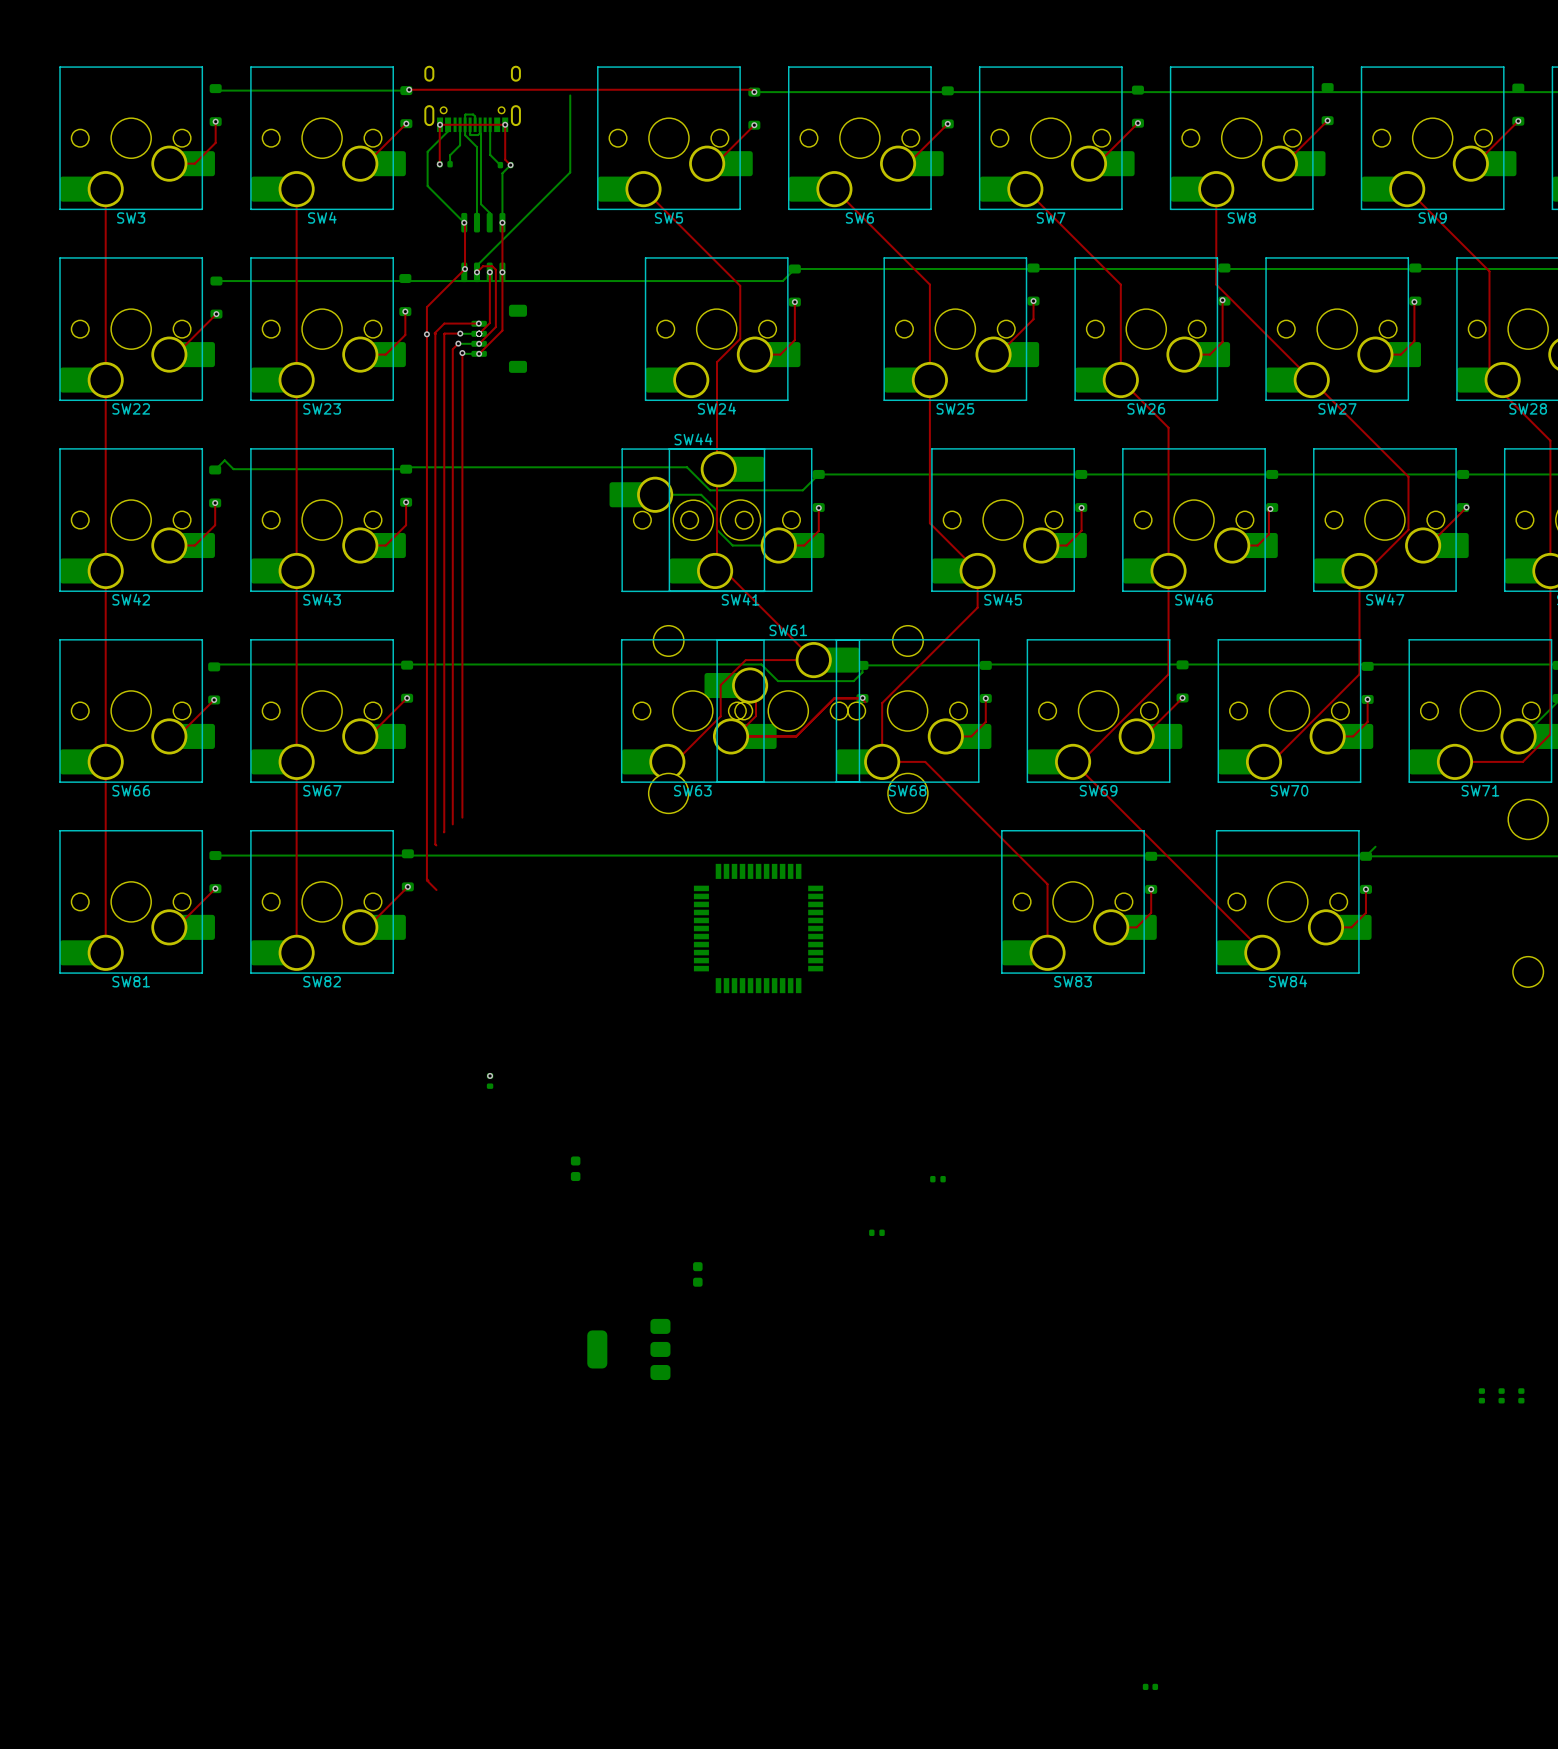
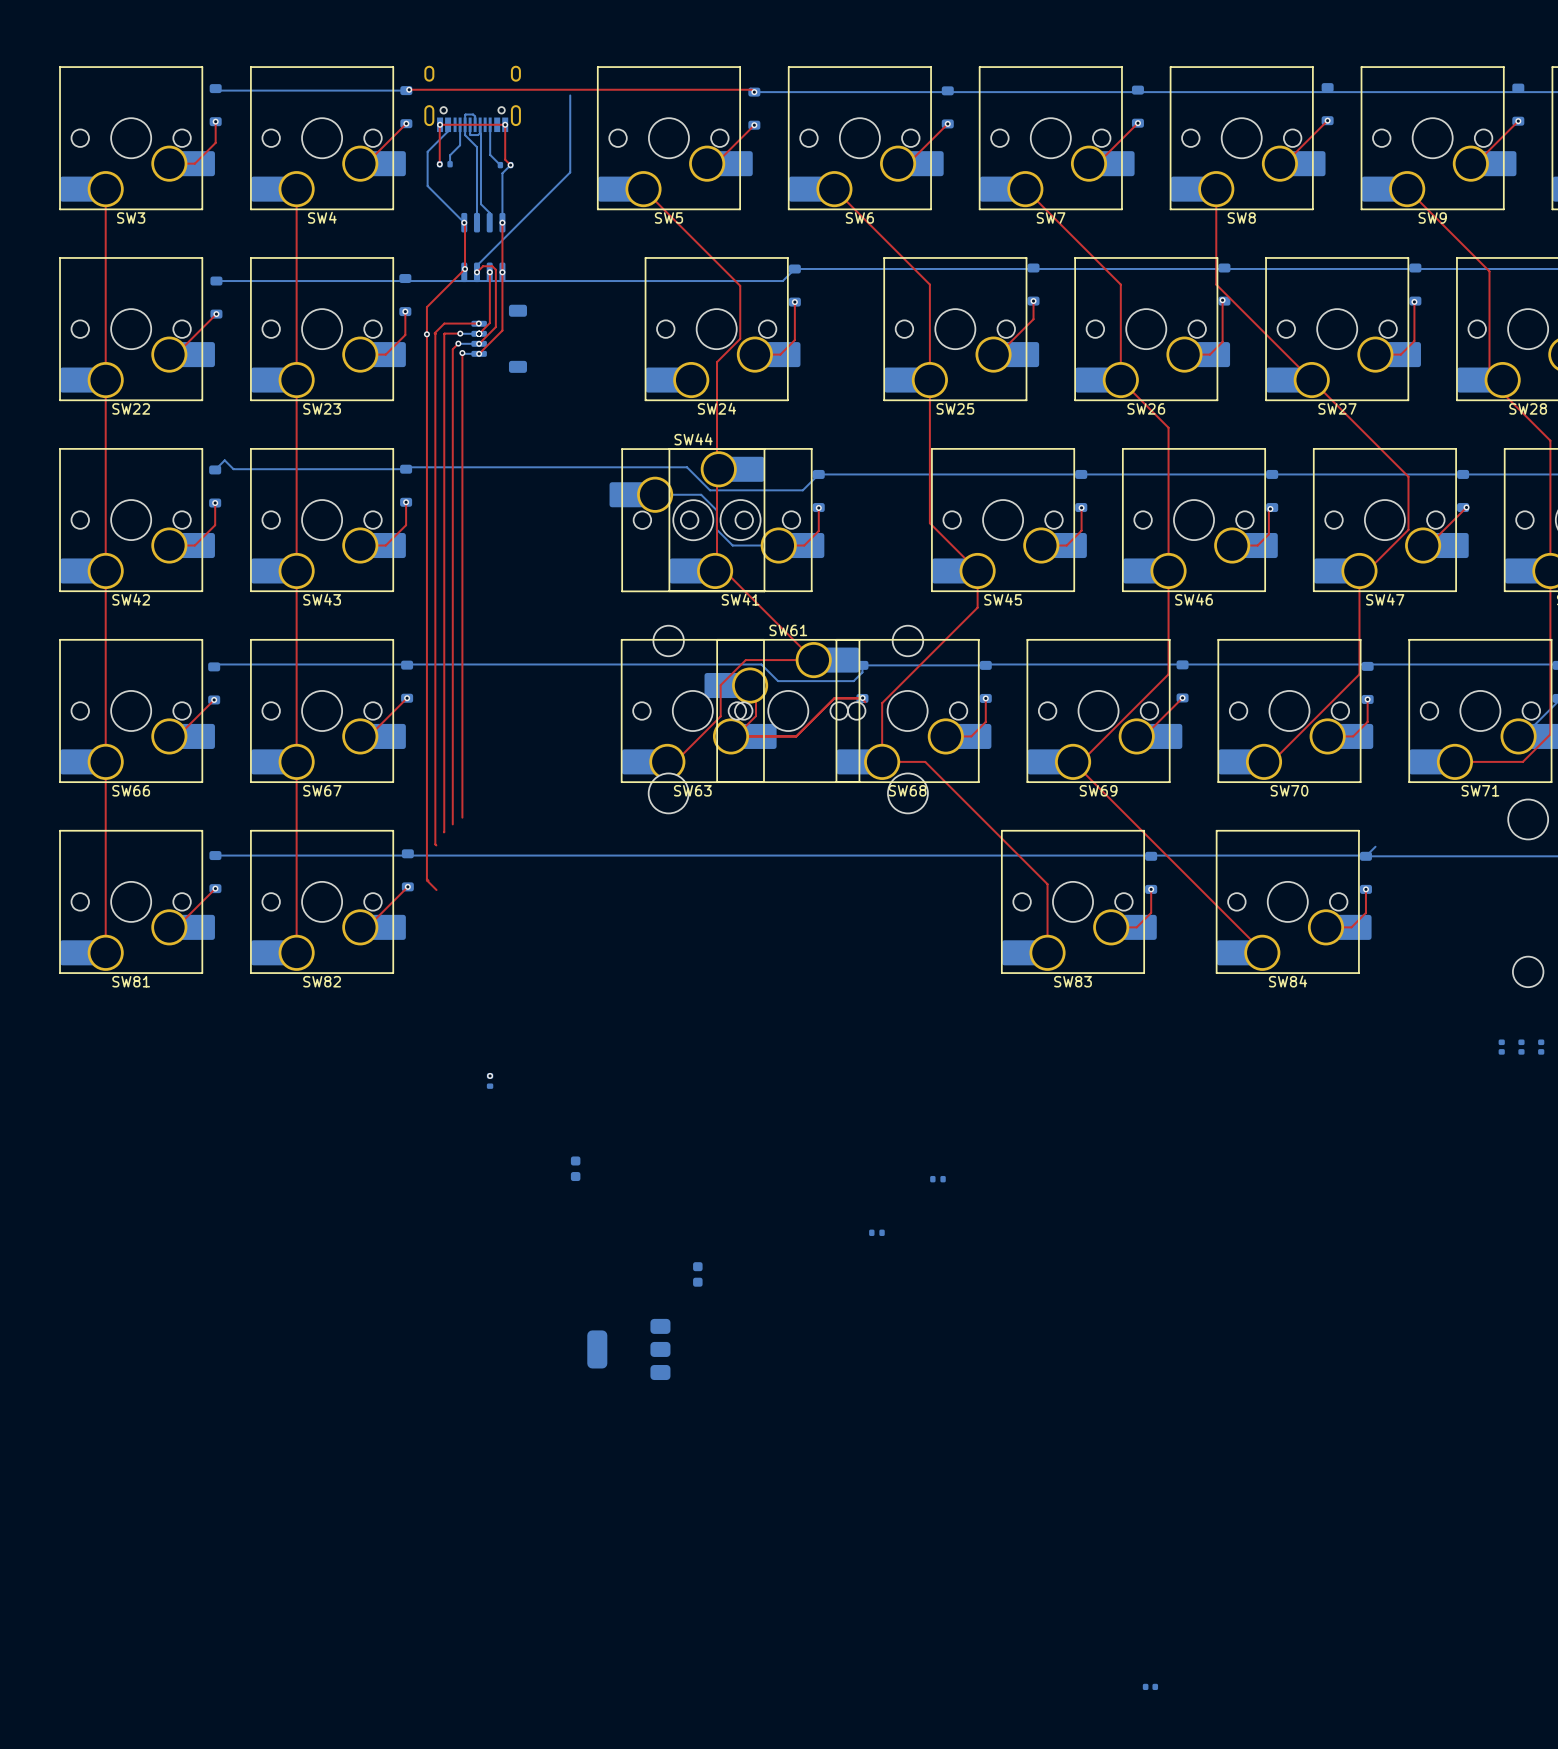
part: (758, 928) -> none
part: none -> (1501, 1047)
part: none -> (1521, 1047)
part: none -> (1541, 1047)
part: (1481, 1395) -> none
part: (1501, 1395) -> none
part: (1521, 1395) -> none

